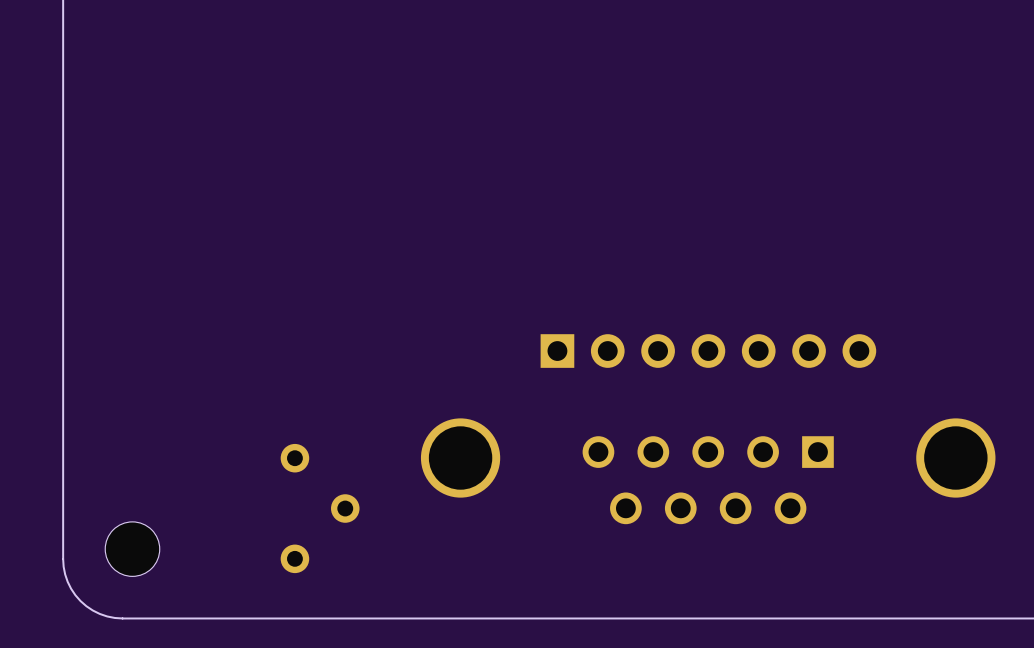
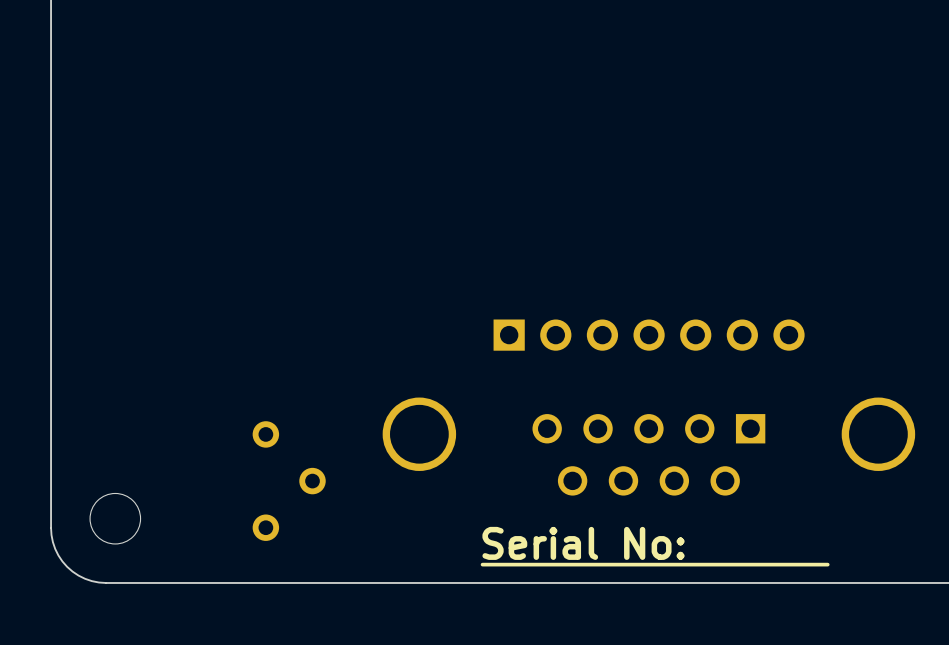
text: none -> Serial No: (583, 543)
line: none -> (827, 564) (482, 564)

